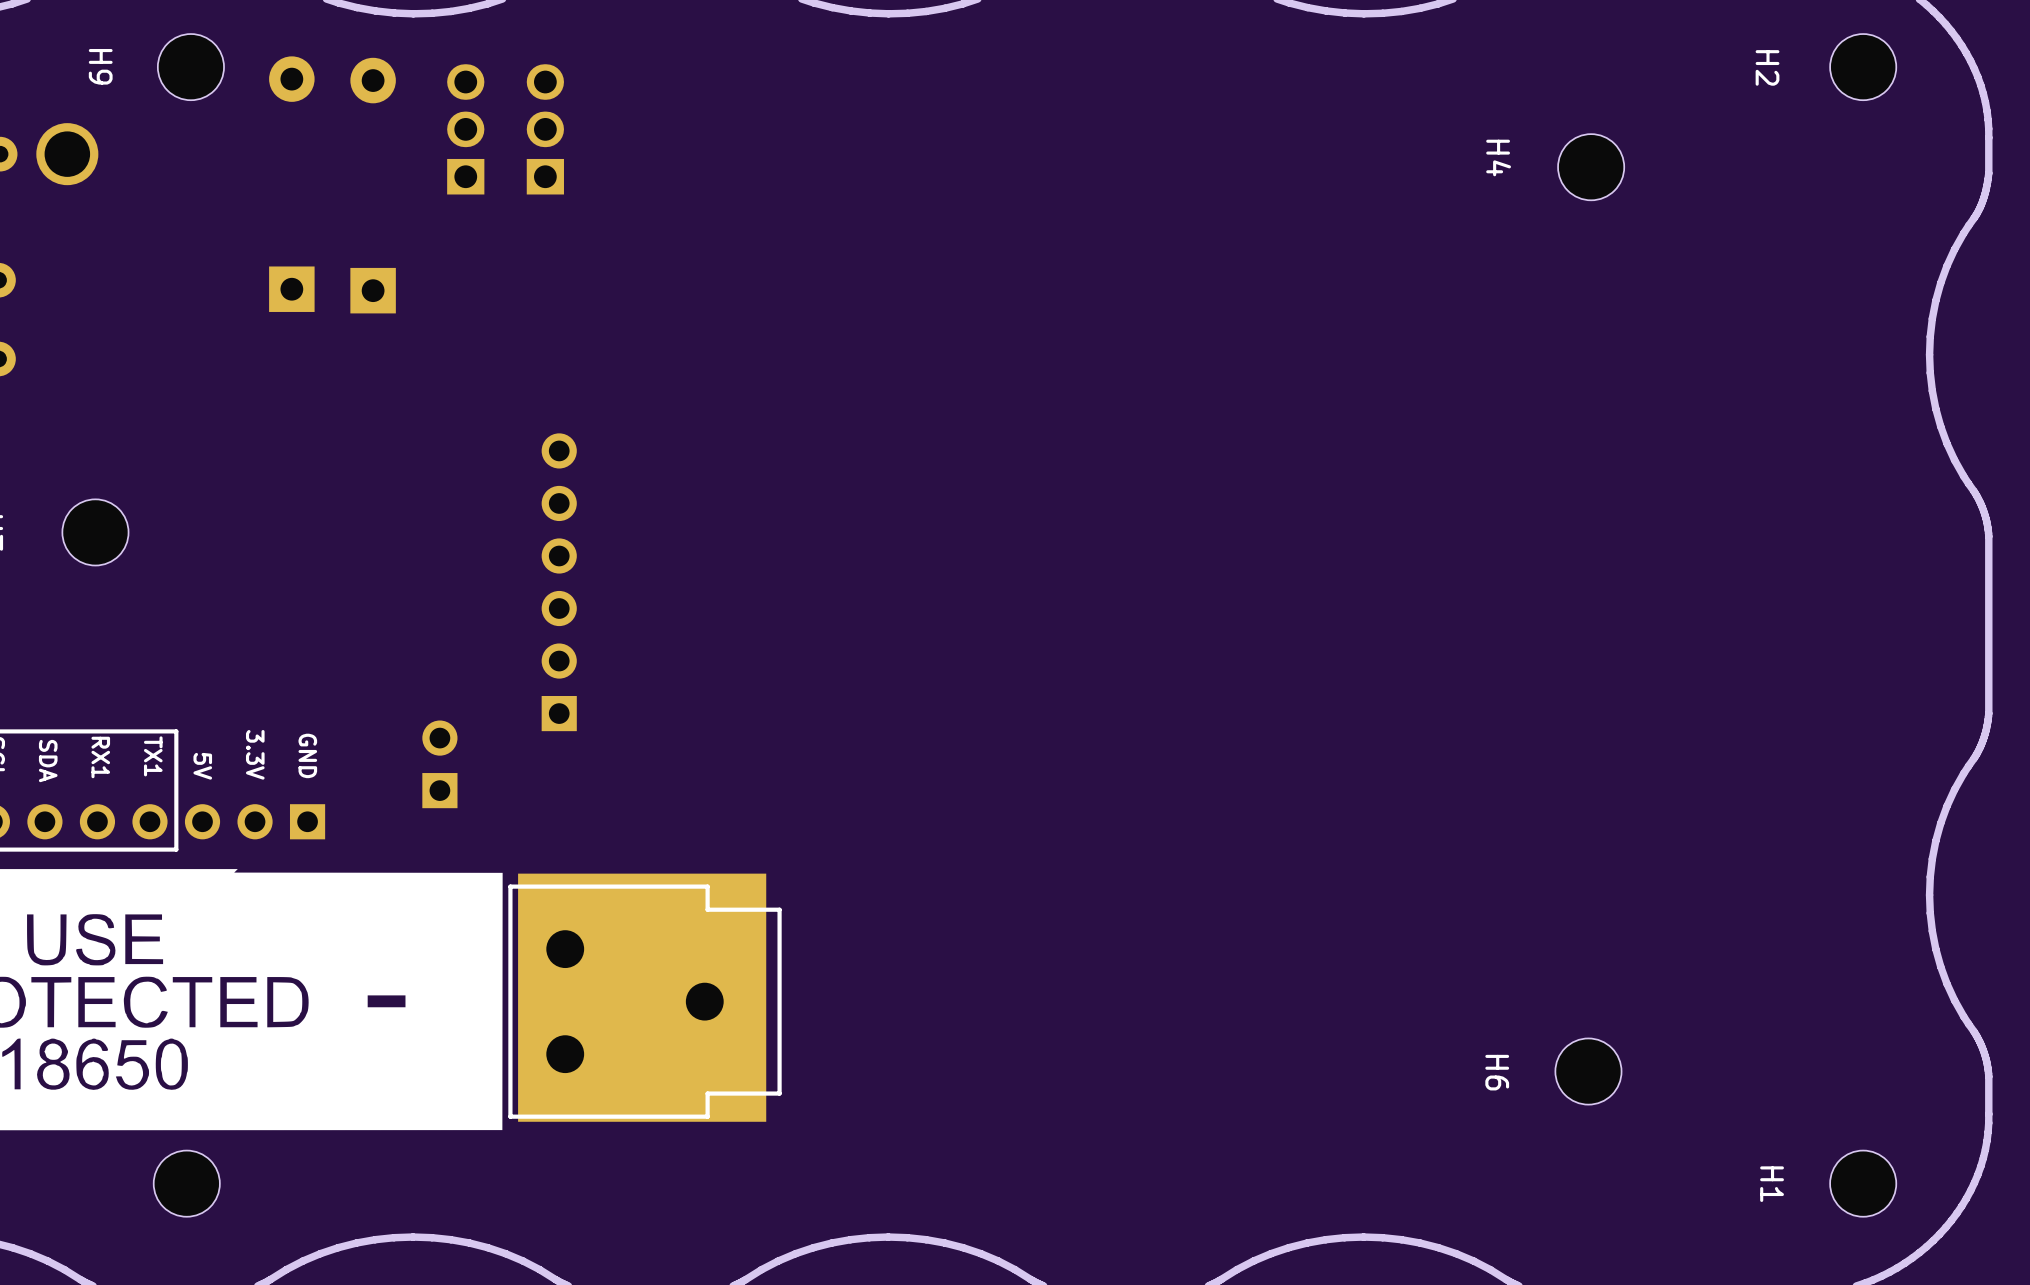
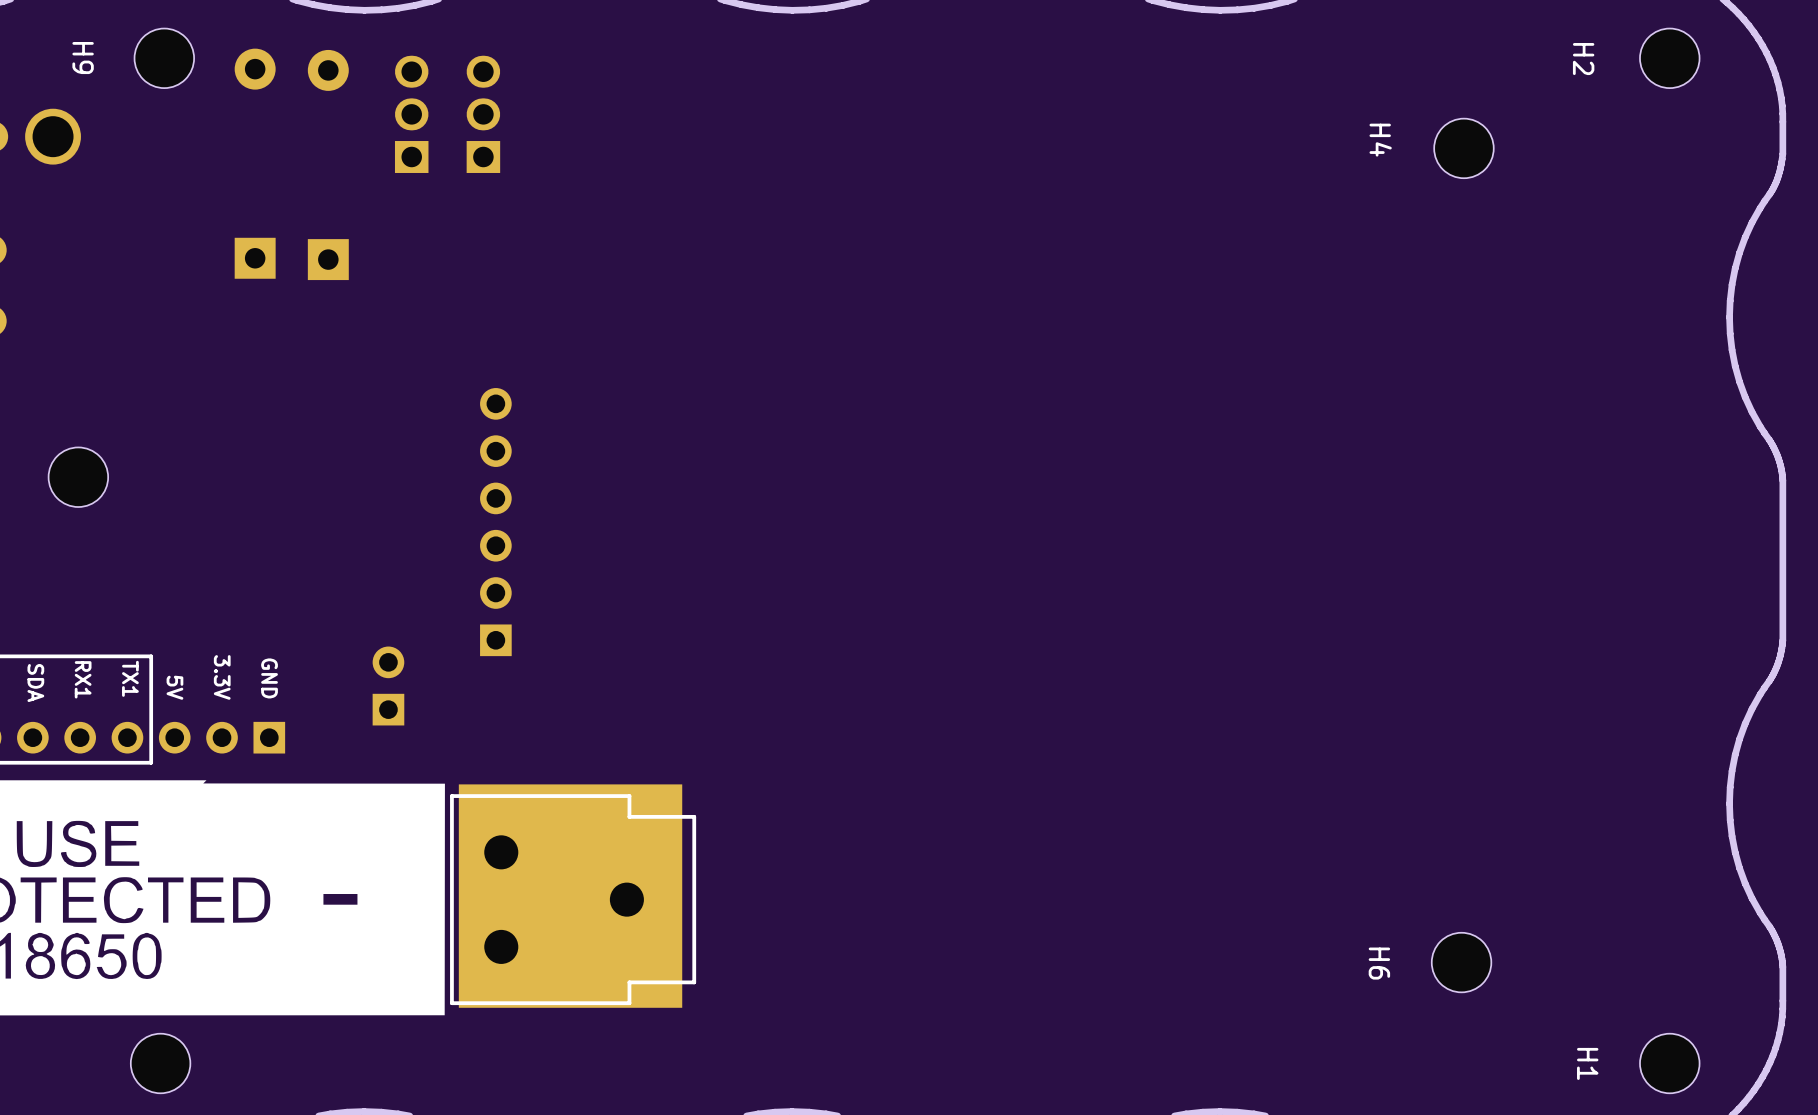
H4 position: (1591, 167) -> (1463, 148)
H6 position: (1588, 1071) -> (1461, 962)

